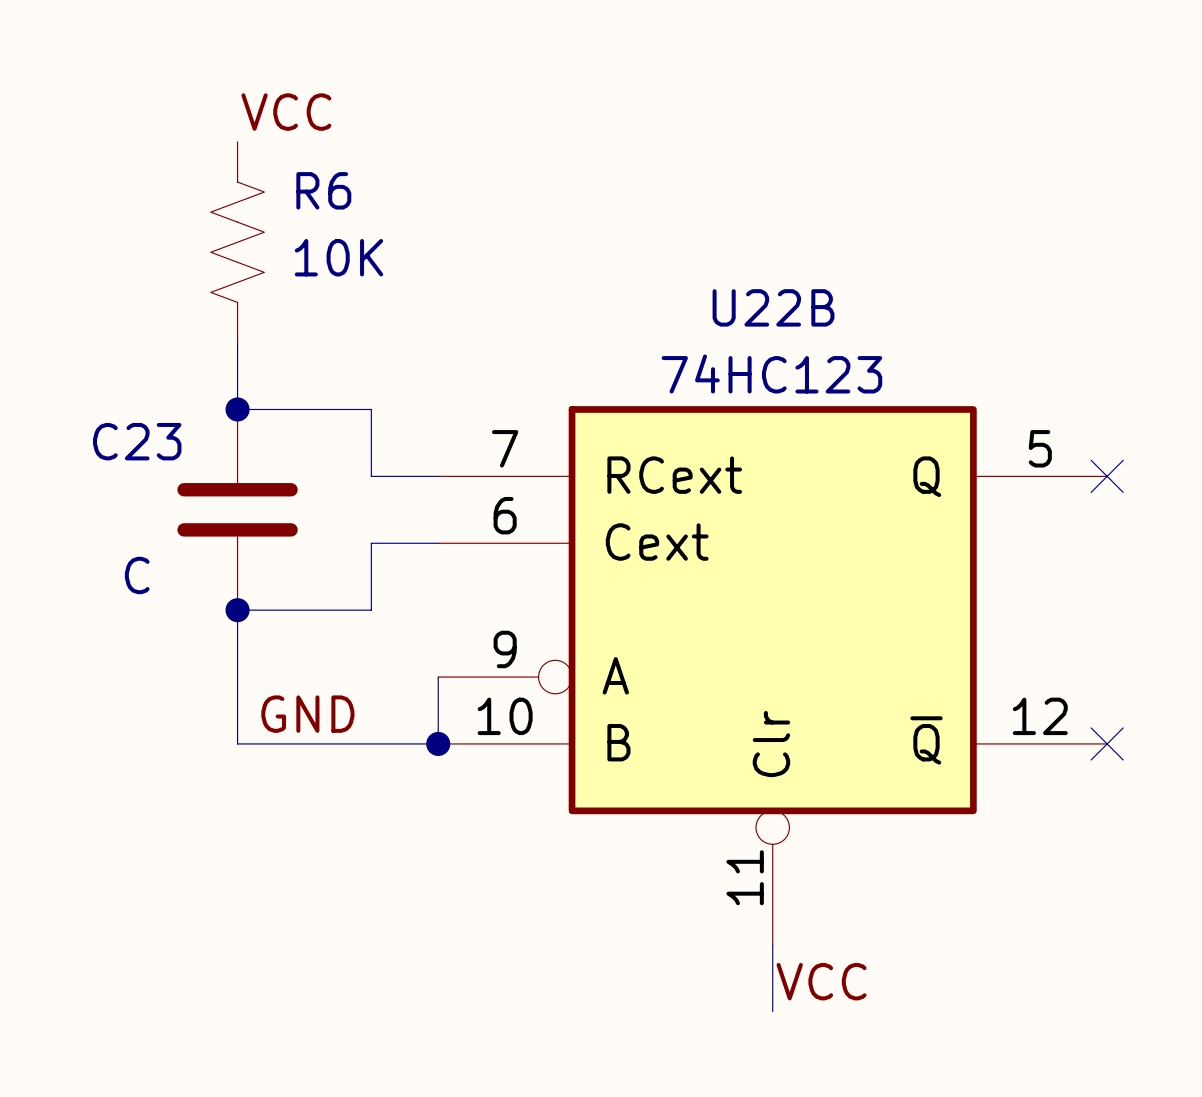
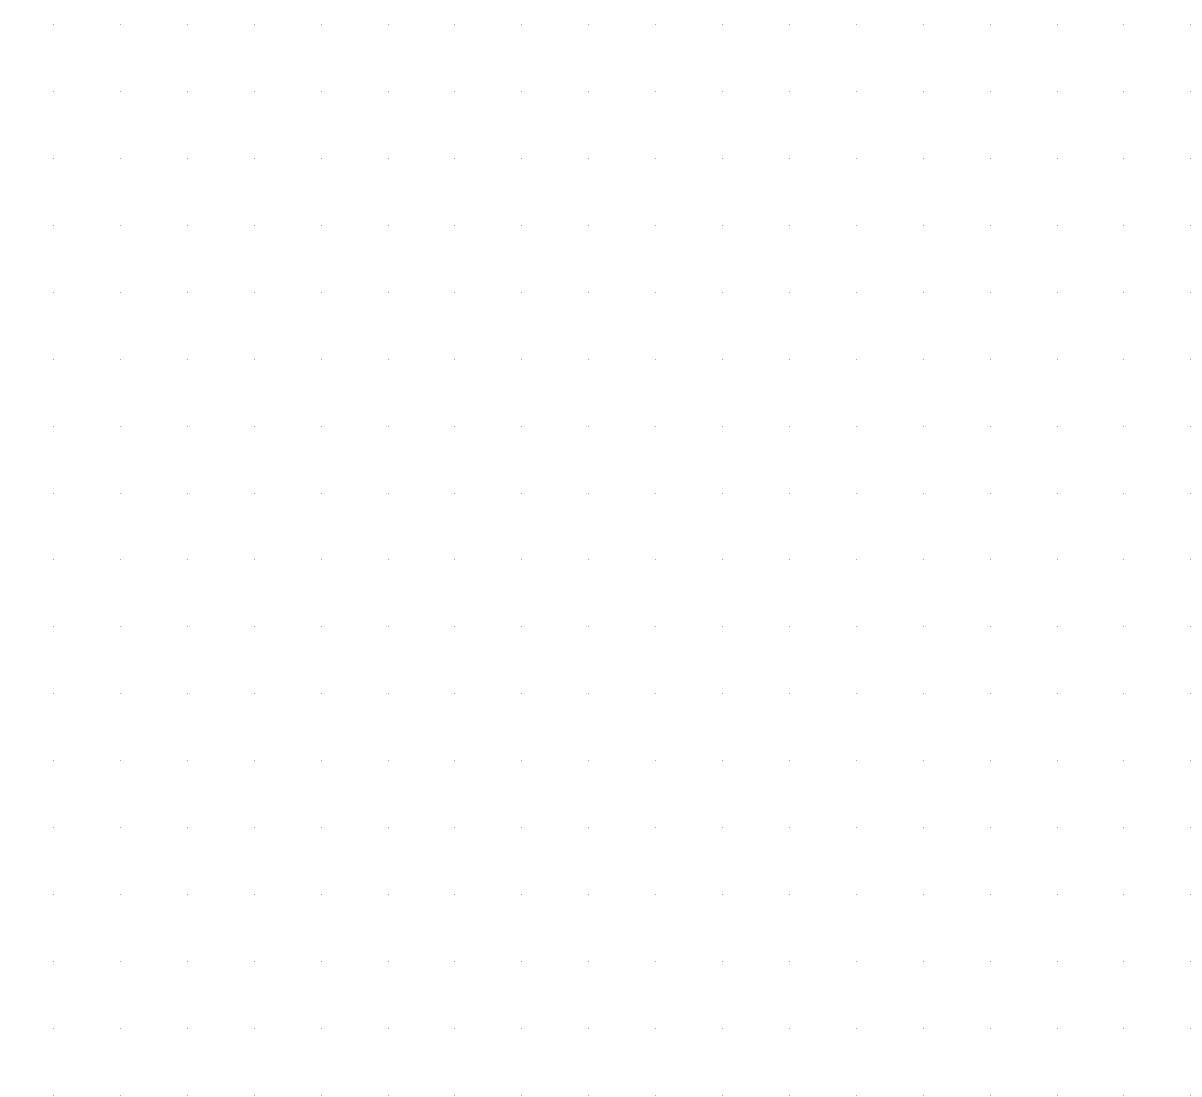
label: VCC (286, 112) -> none
R6: 10K (237, 242) -> none
wire: (237, 342) (237, 409) (371, 409) (371, 476) (438, 476) -> none
junction: (237, 409) -> none
no-connect mark: (1107, 476) -> none
C23: C (237, 509) -> none
wire: (438, 543) (371, 543) (371, 610) (237, 610) (237, 743) (438, 743) (438, 677) -> none
junction: (237, 610) -> none
U22B: 74HC123 (772, 675) -> none
label: GND (307, 714) -> none
junction: (438, 743) -> none
no-connect mark: (1107, 743) -> none
wire: (772, 944) (772, 1011) -> none
label: VCC (821, 981) -> none

